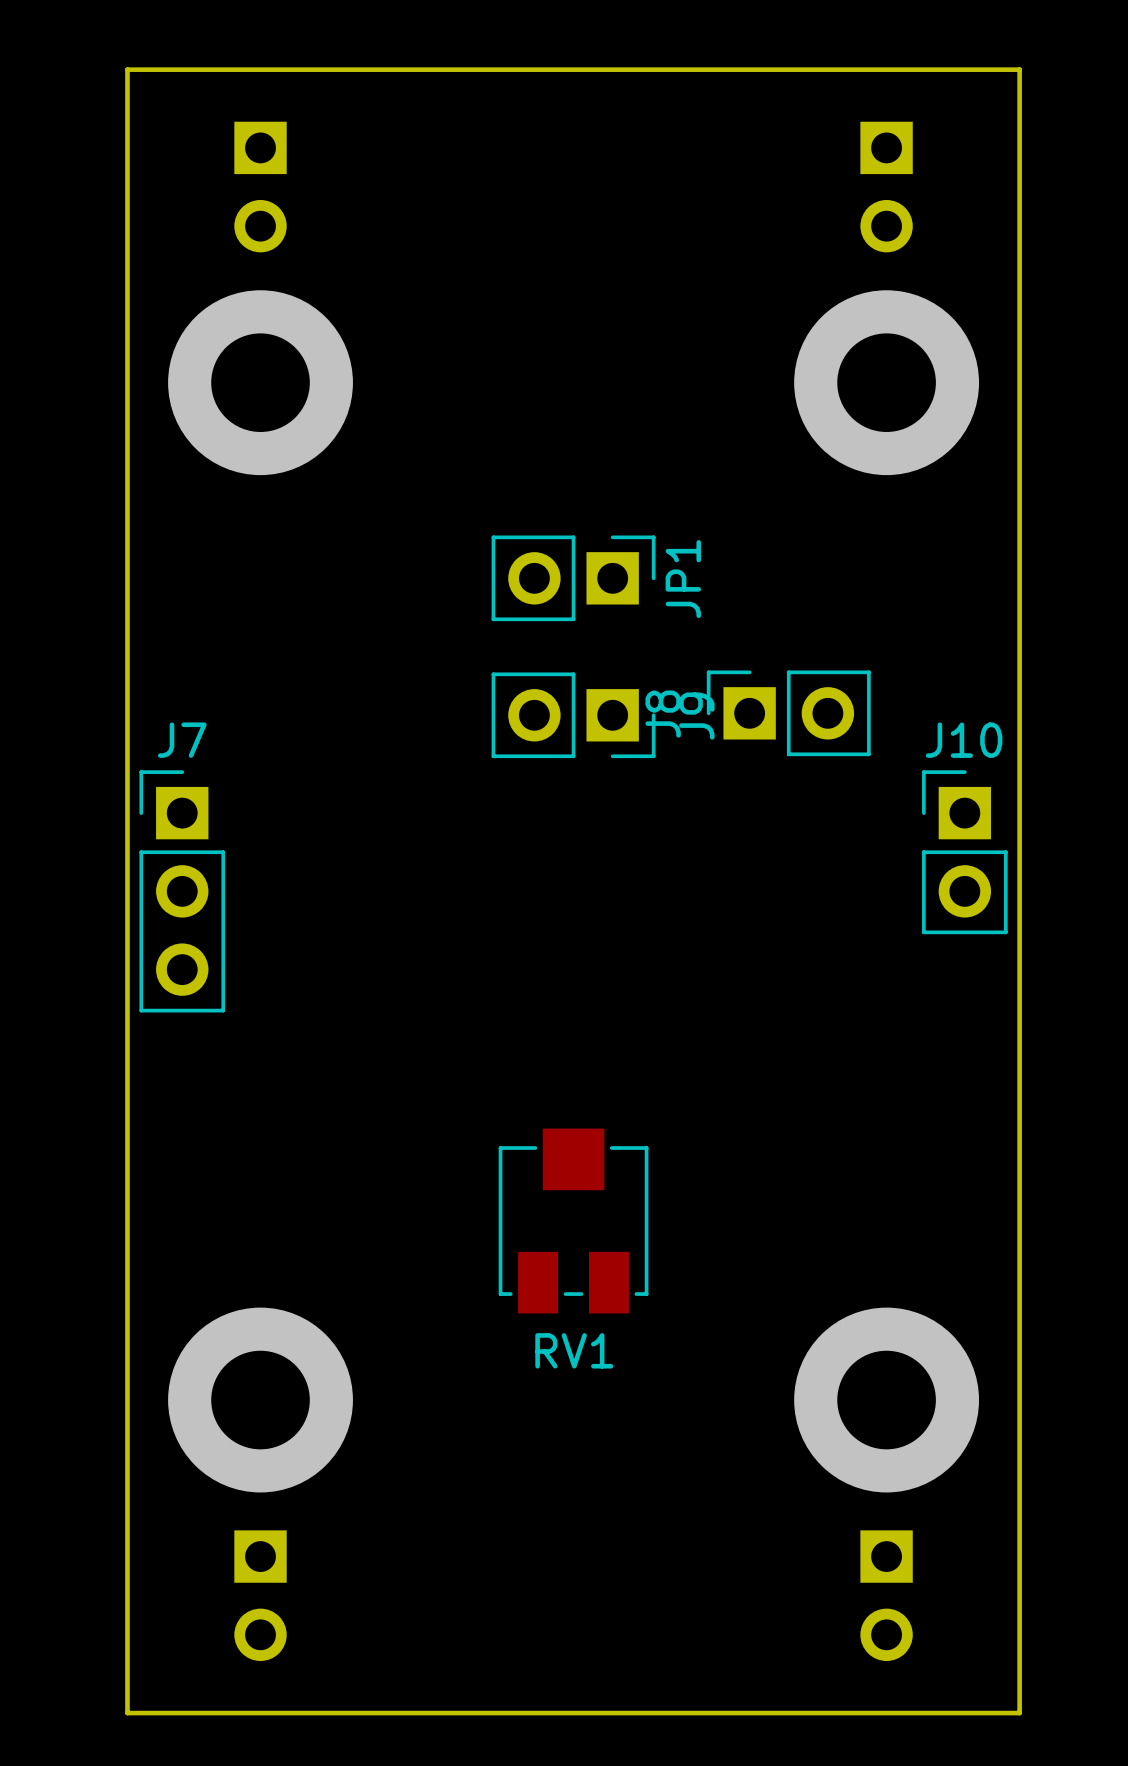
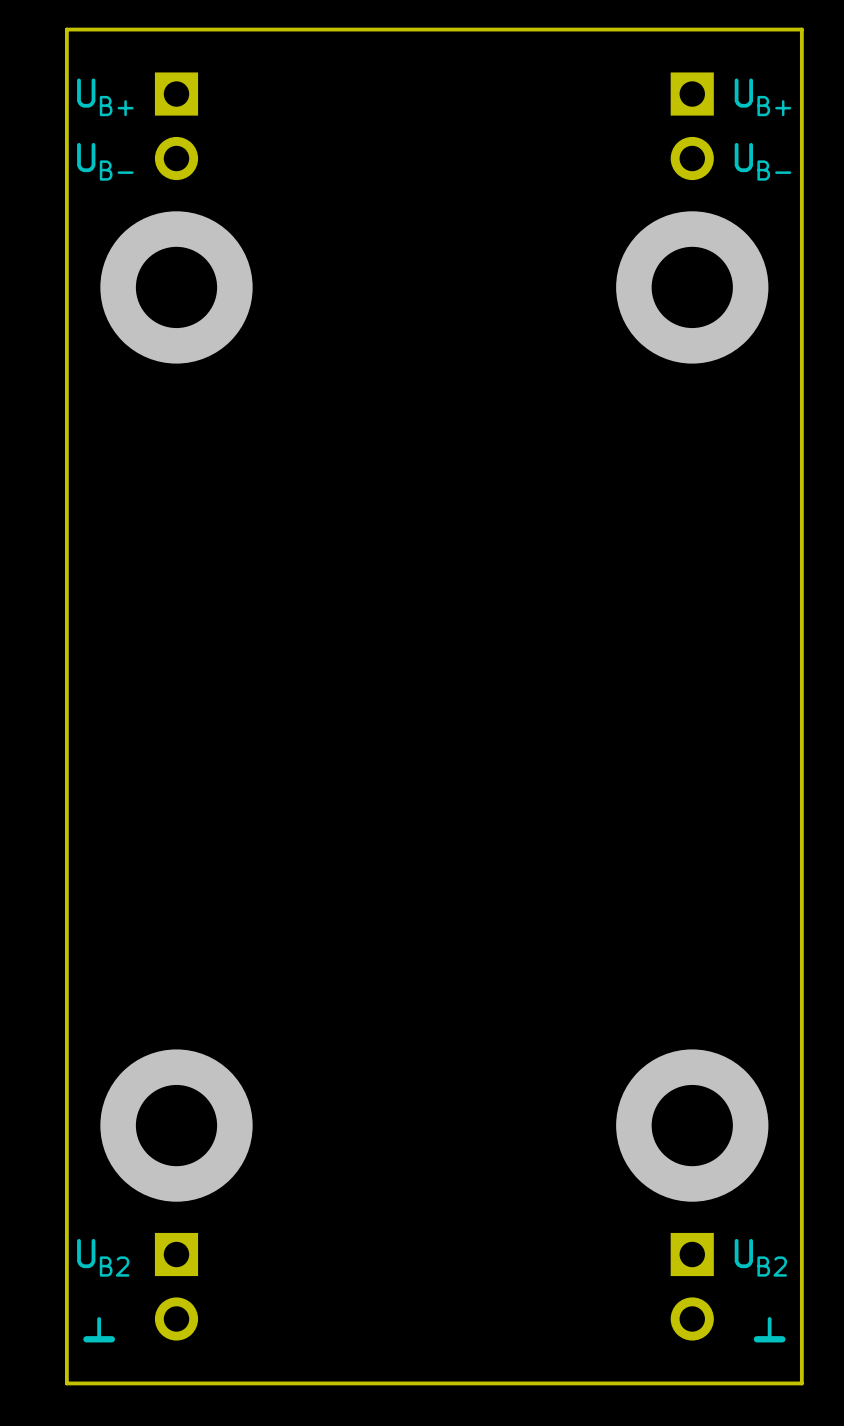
drawing: none -> [77, 78, 134, 181]
drawing: none -> [734, 78, 792, 181]
JP1: (573, 578) -> none
J8: (788, 713) -> none
J9: (573, 715) -> none
J10: (964, 852) -> none
J7: (182, 891) -> none
RV1: (573, 1221) -> none
drawing: none -> [77, 1238, 130, 1277]
drawing: none -> [734, 1238, 787, 1277]
drawing: none -> [83, 1317, 115, 1343]
drawing: none -> [753, 1317, 786, 1343]

